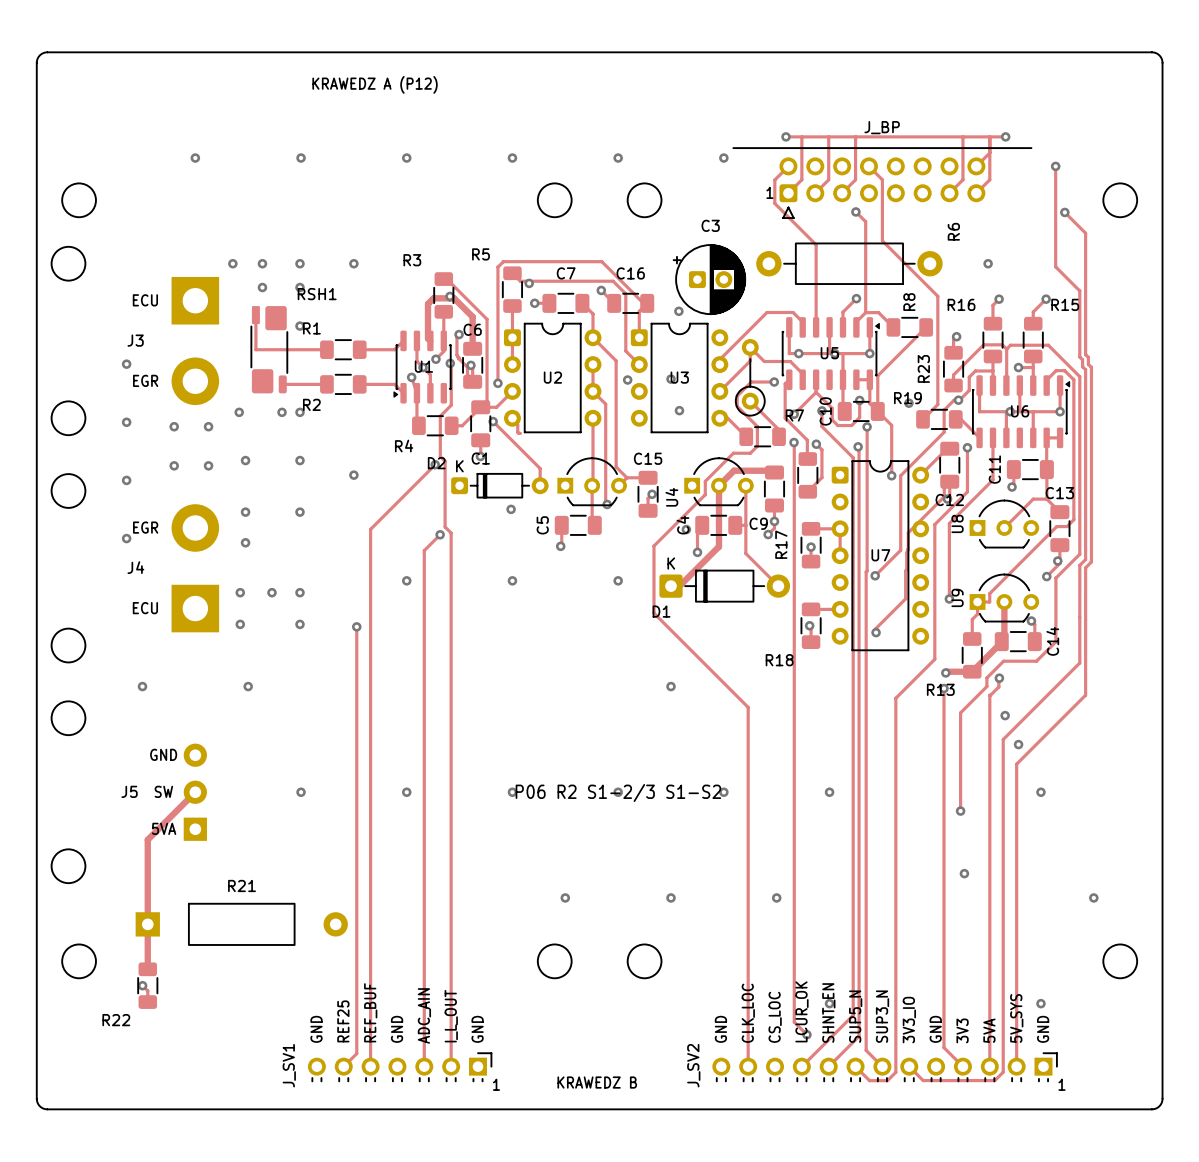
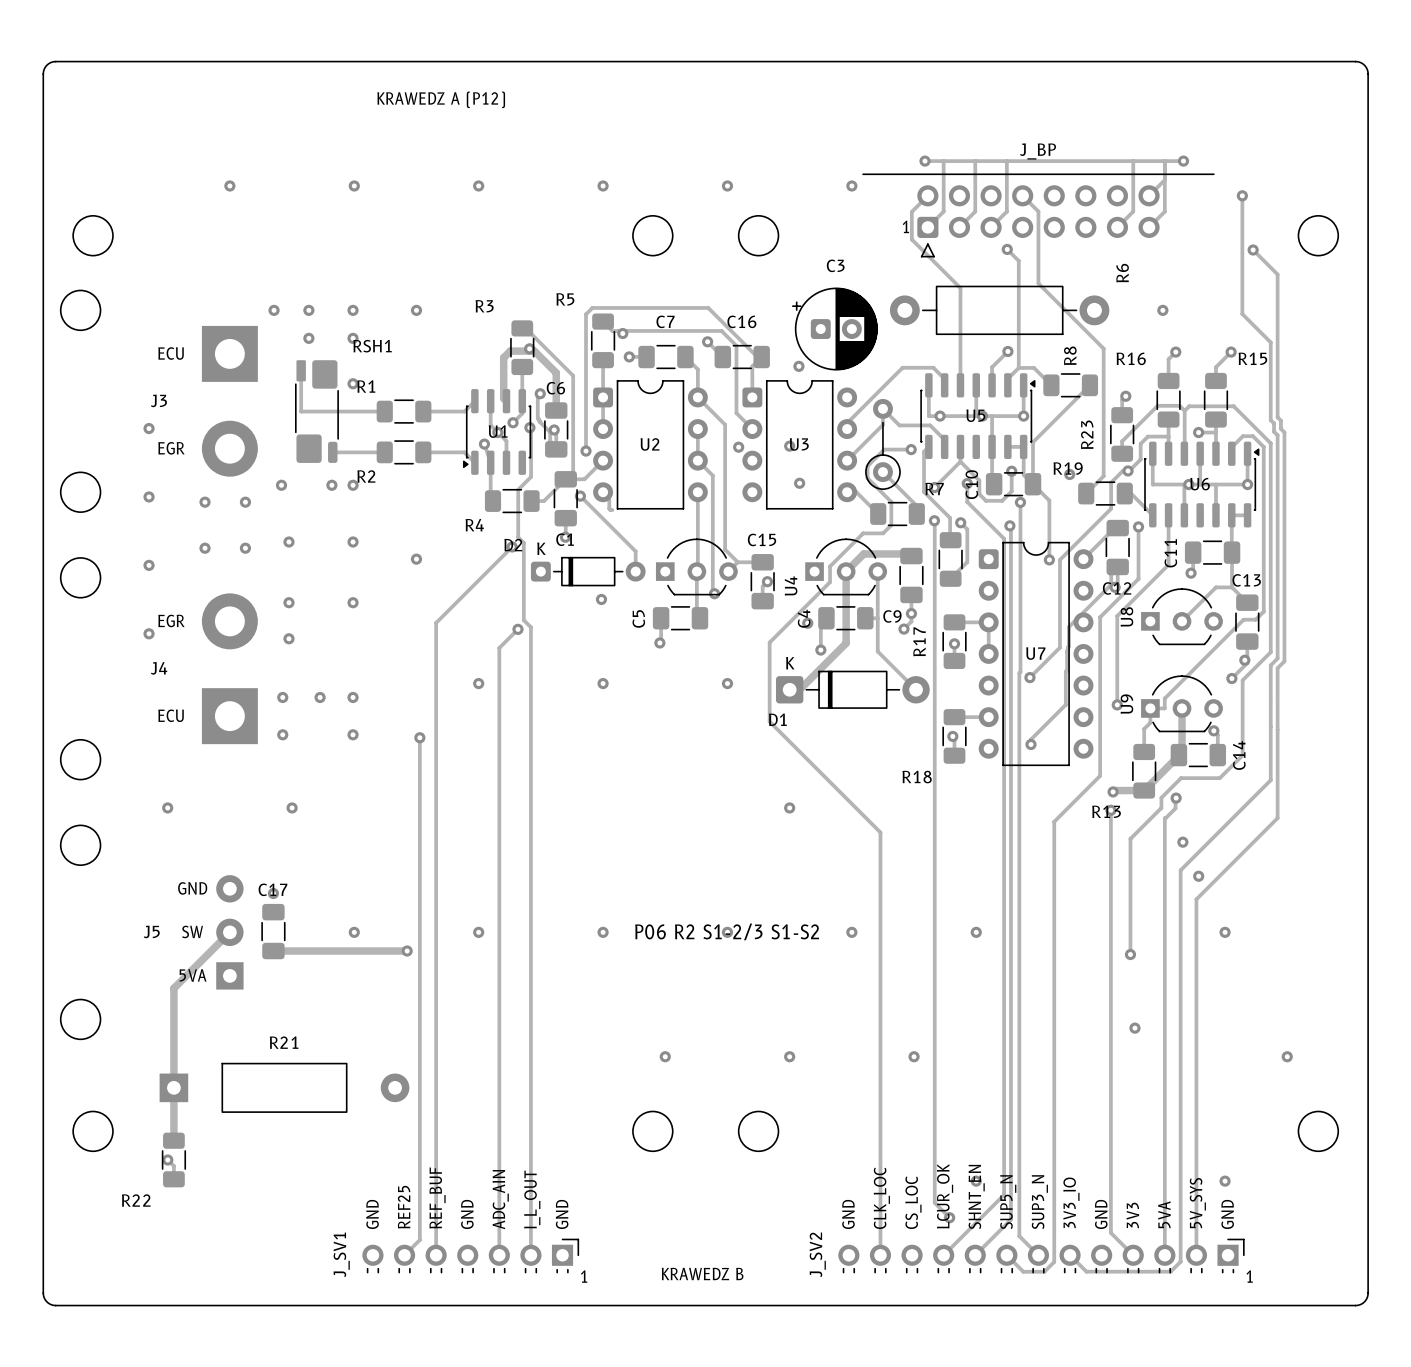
via: none -> (273, 893)
C17: none -> (273, 931)
track: none -> (273, 951) (407, 951)
via: none -> (407, 951)

